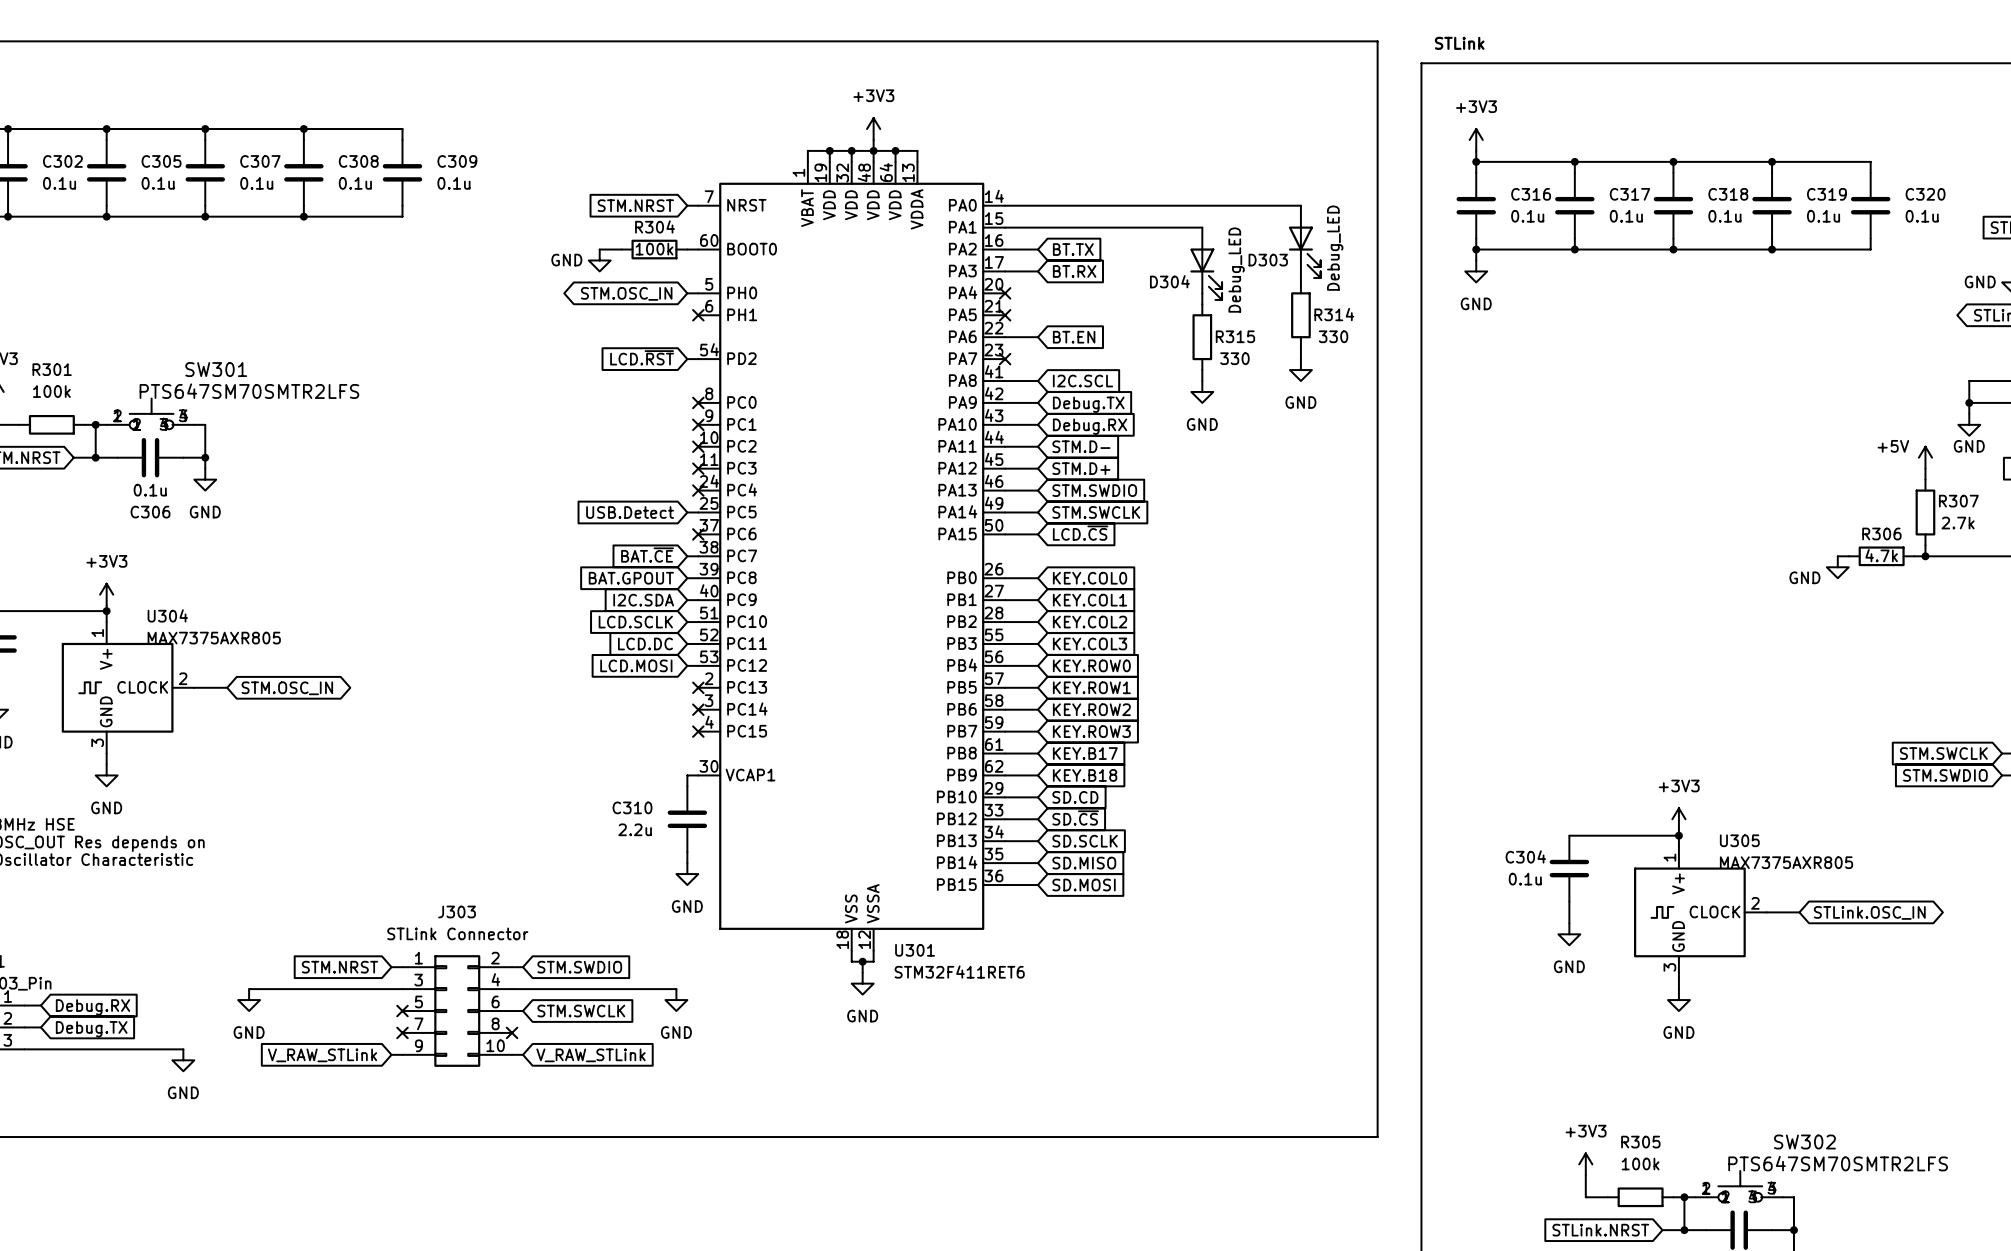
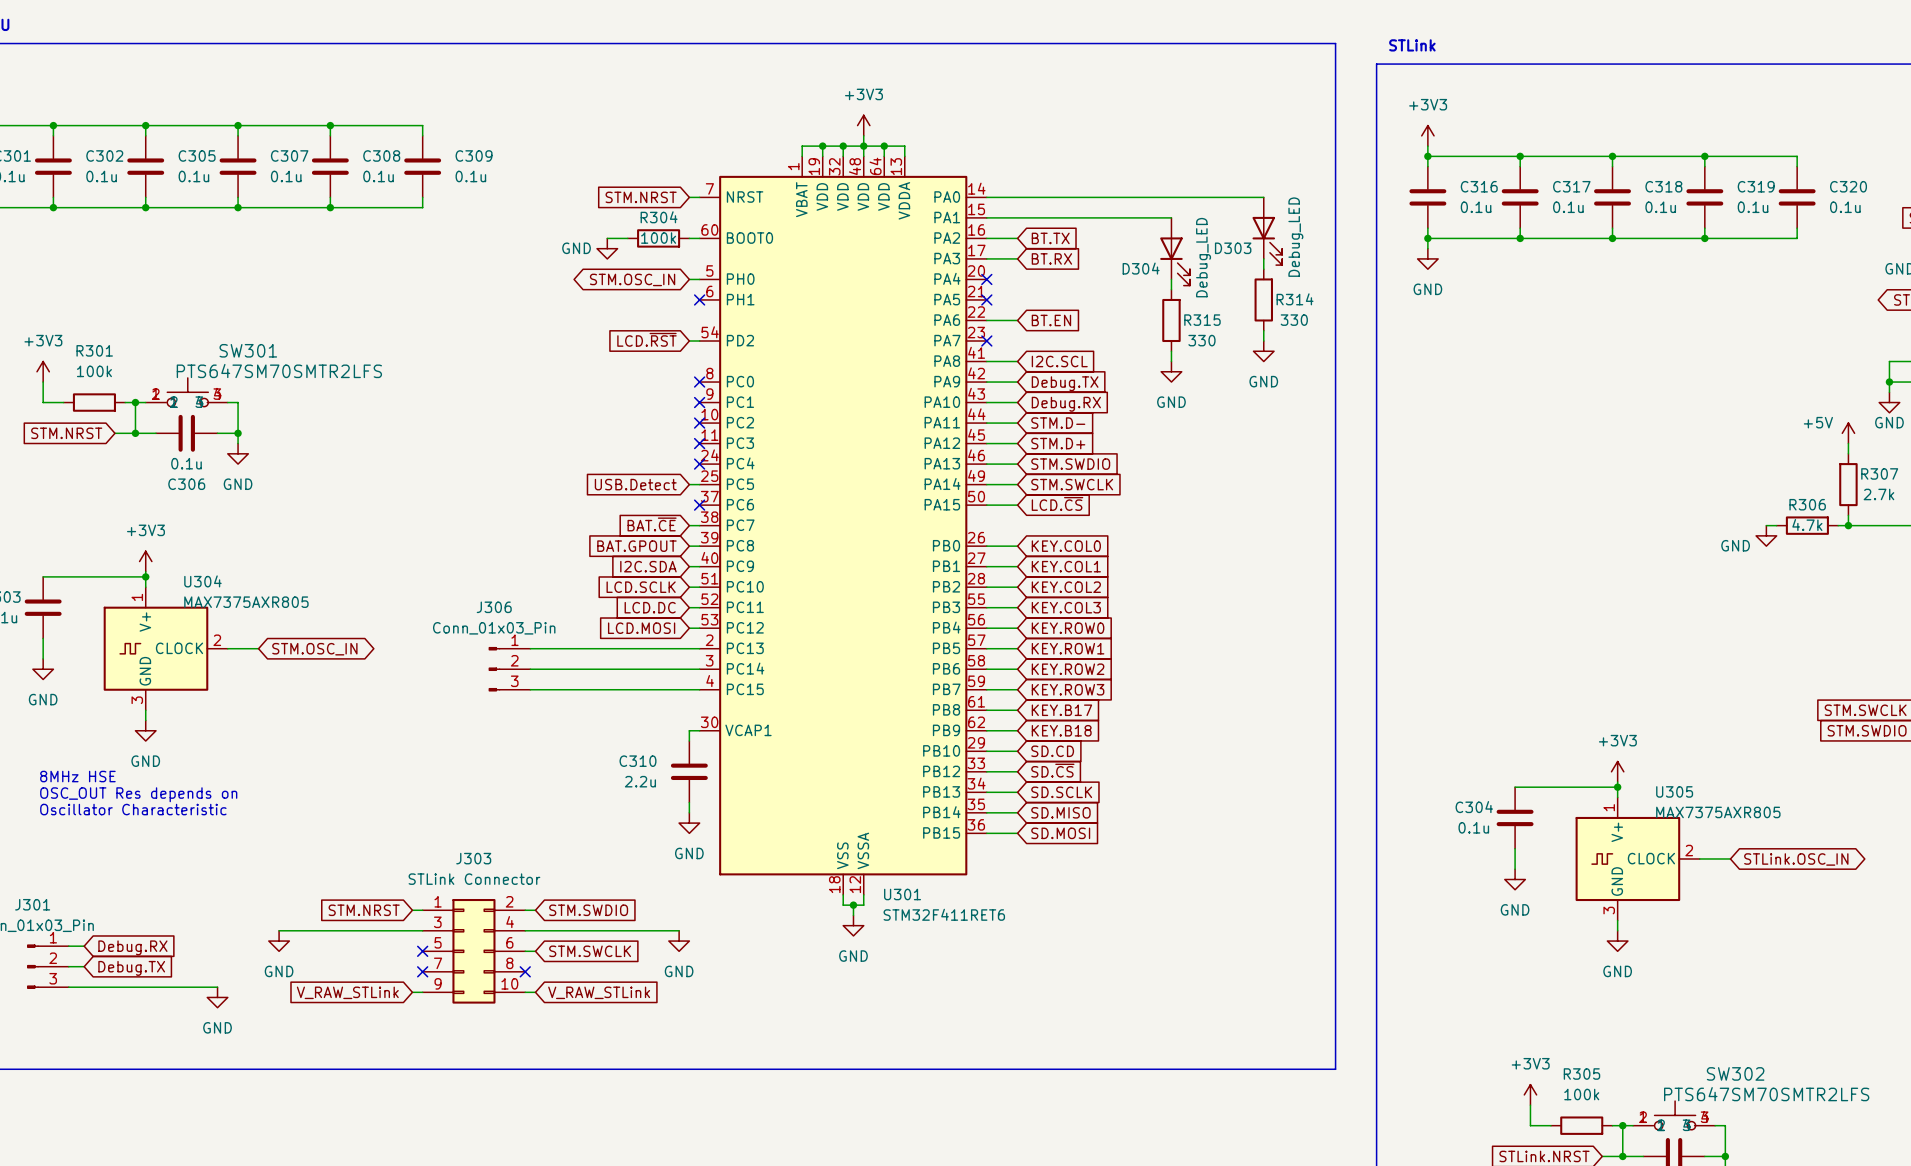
wire: none -> (530, 648) (699, 648)
no-connect mark: (698, 687) -> none
J306: none -> Conn_01x03_Pin (509, 669)
wire: none -> (530, 669) (699, 669)
no-connect mark: (698, 709) -> none
wire: none -> (530, 689) (699, 689)
no-connect mark: (698, 731) -> none

